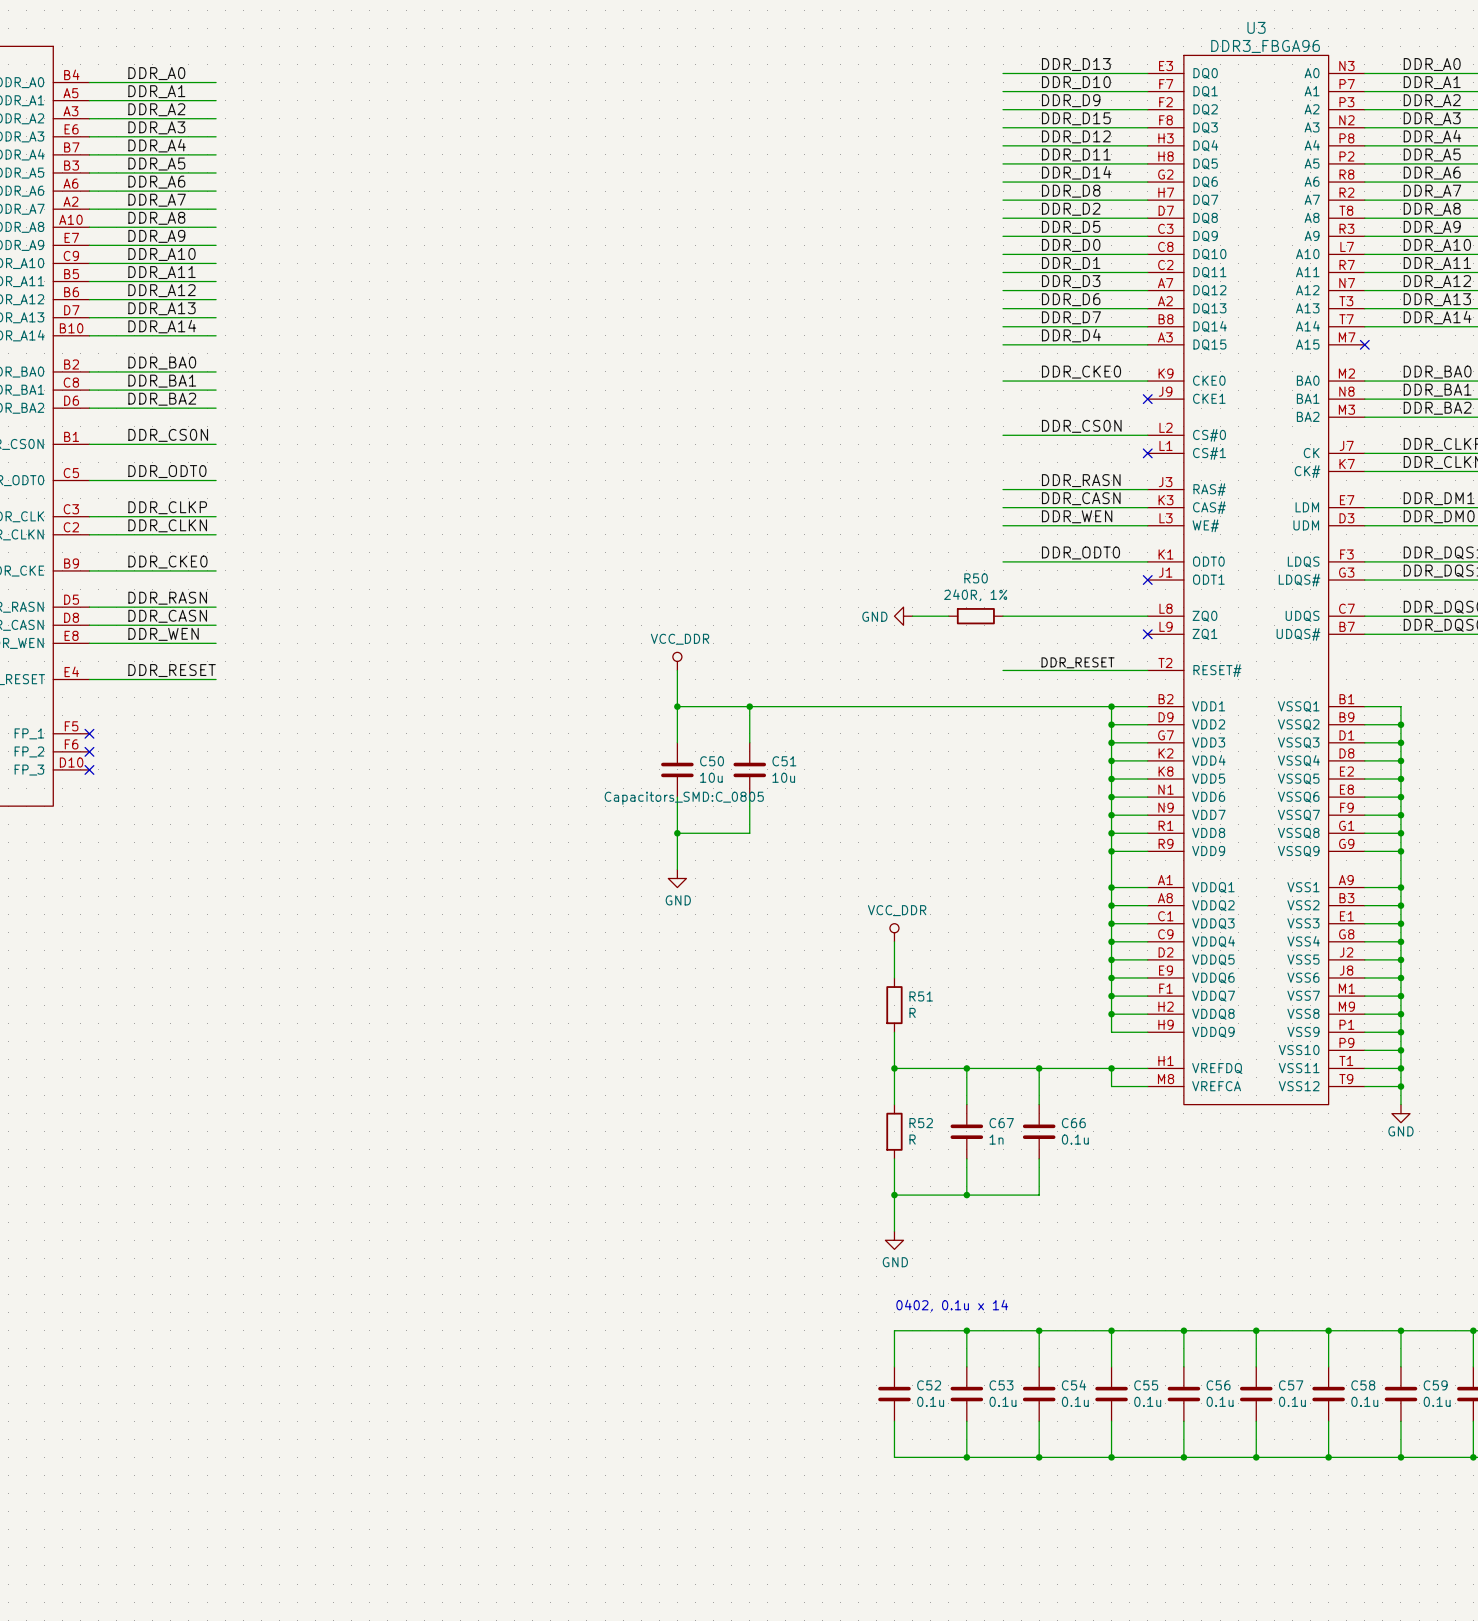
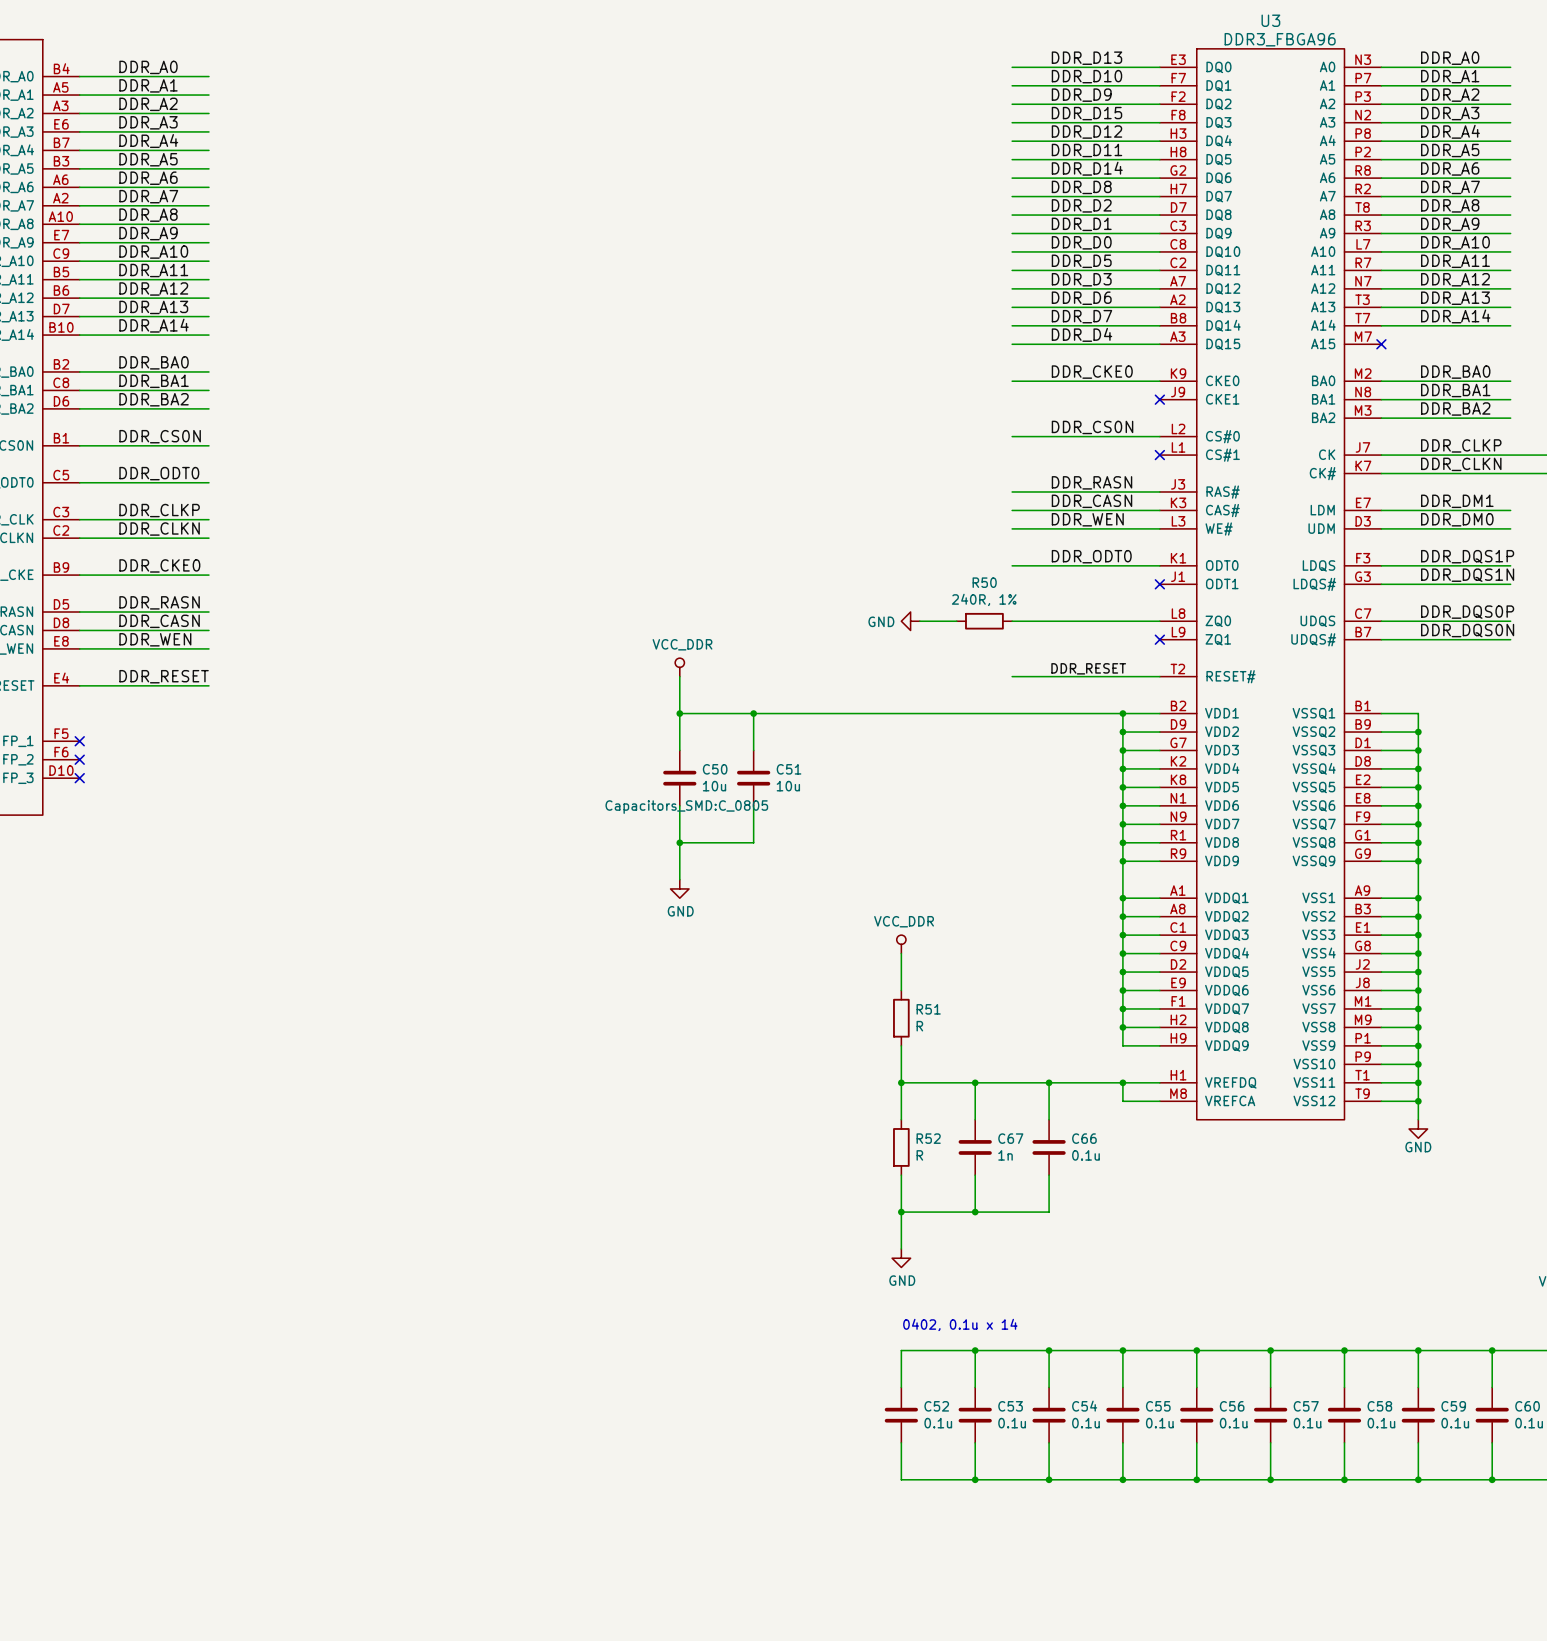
label: DDR_D5 (1071, 227) -> DDR_D1 (1081, 224)
label: DDR_D1 (1071, 263) -> DDR_D5 (1081, 261)

